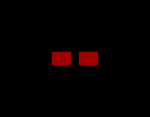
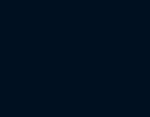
part: (74, 58) -> none

